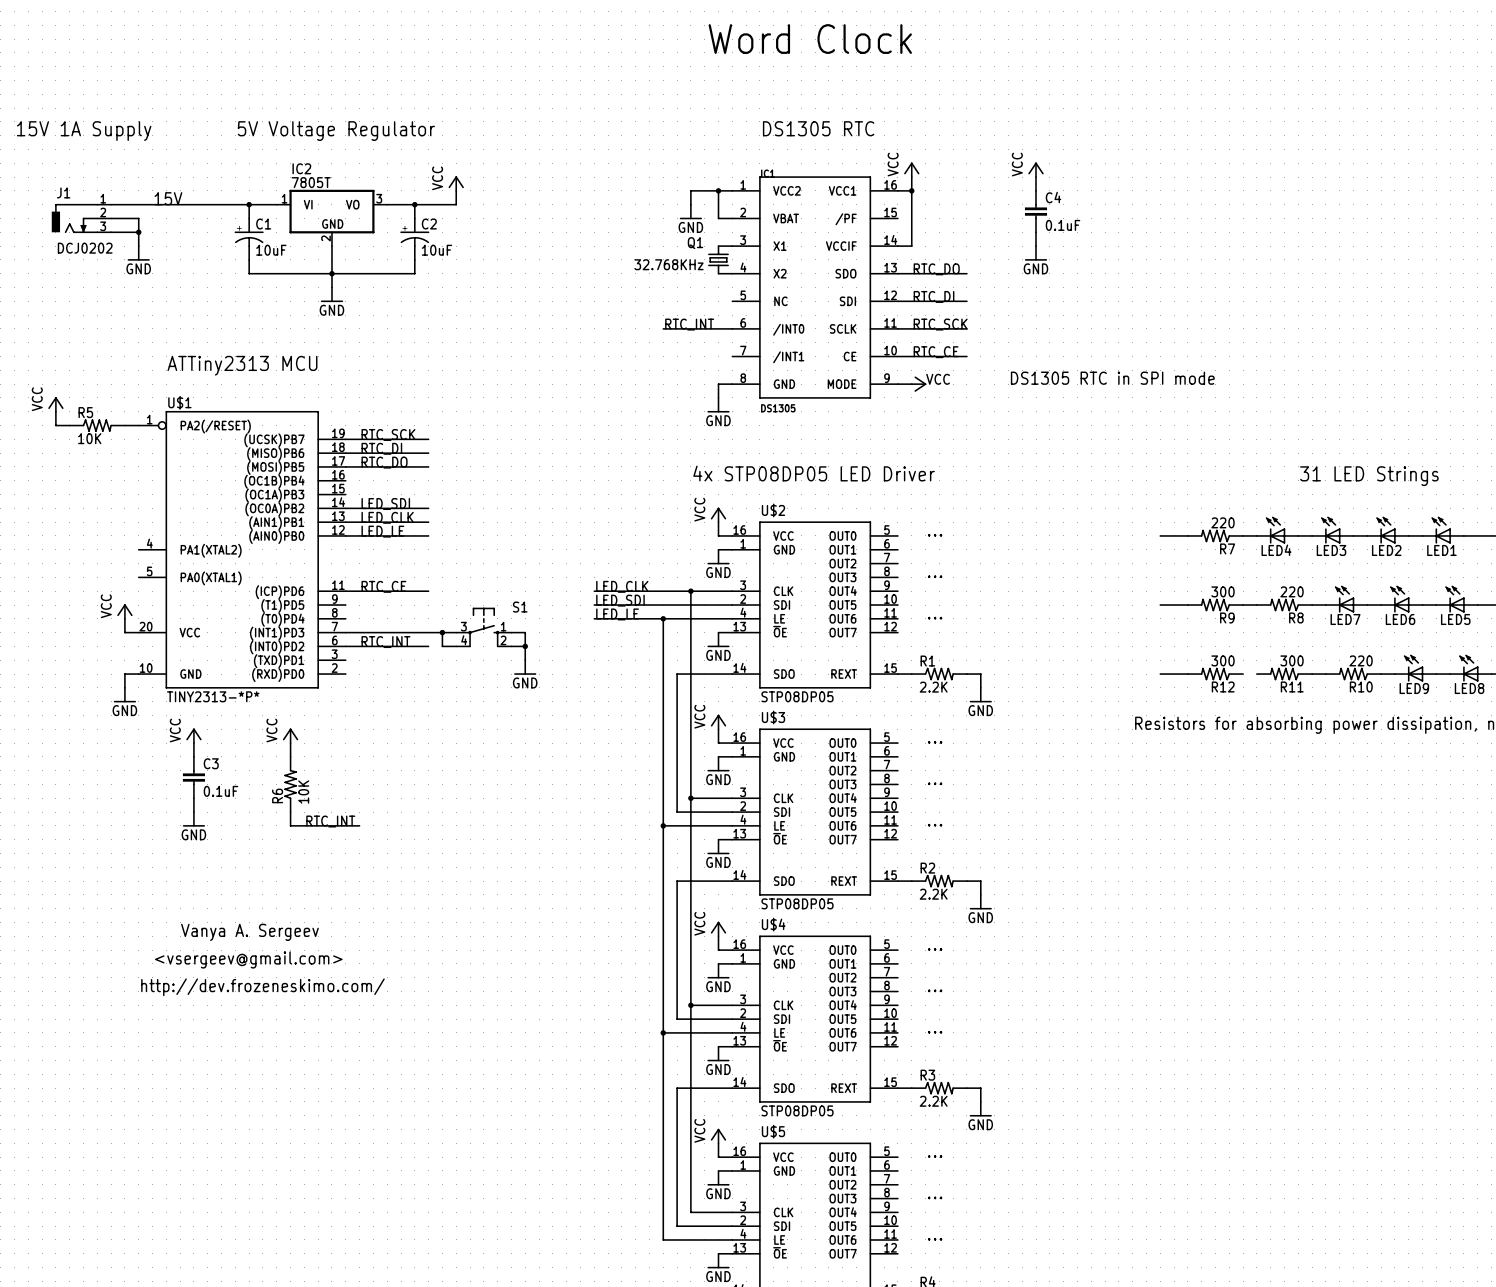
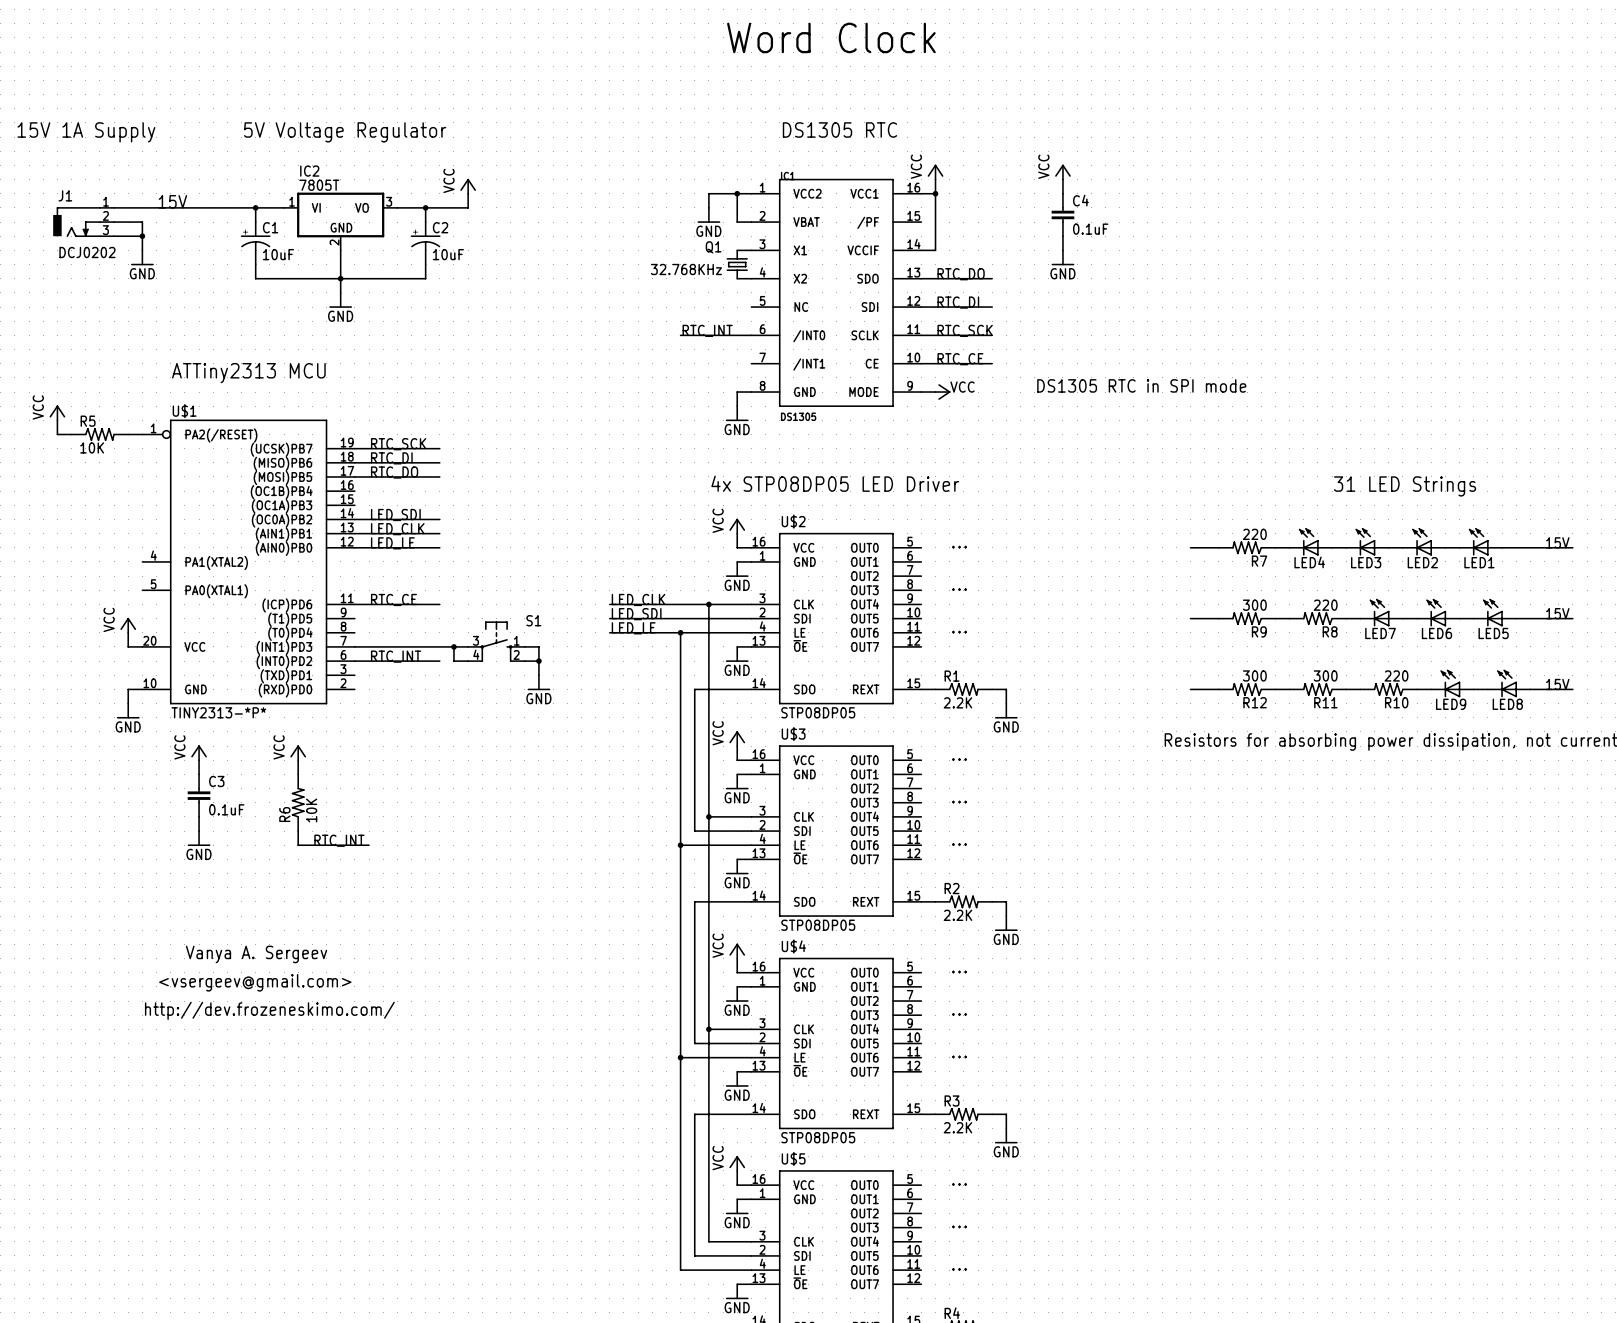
wire: none -> (1275, 689) (1289, 689)

